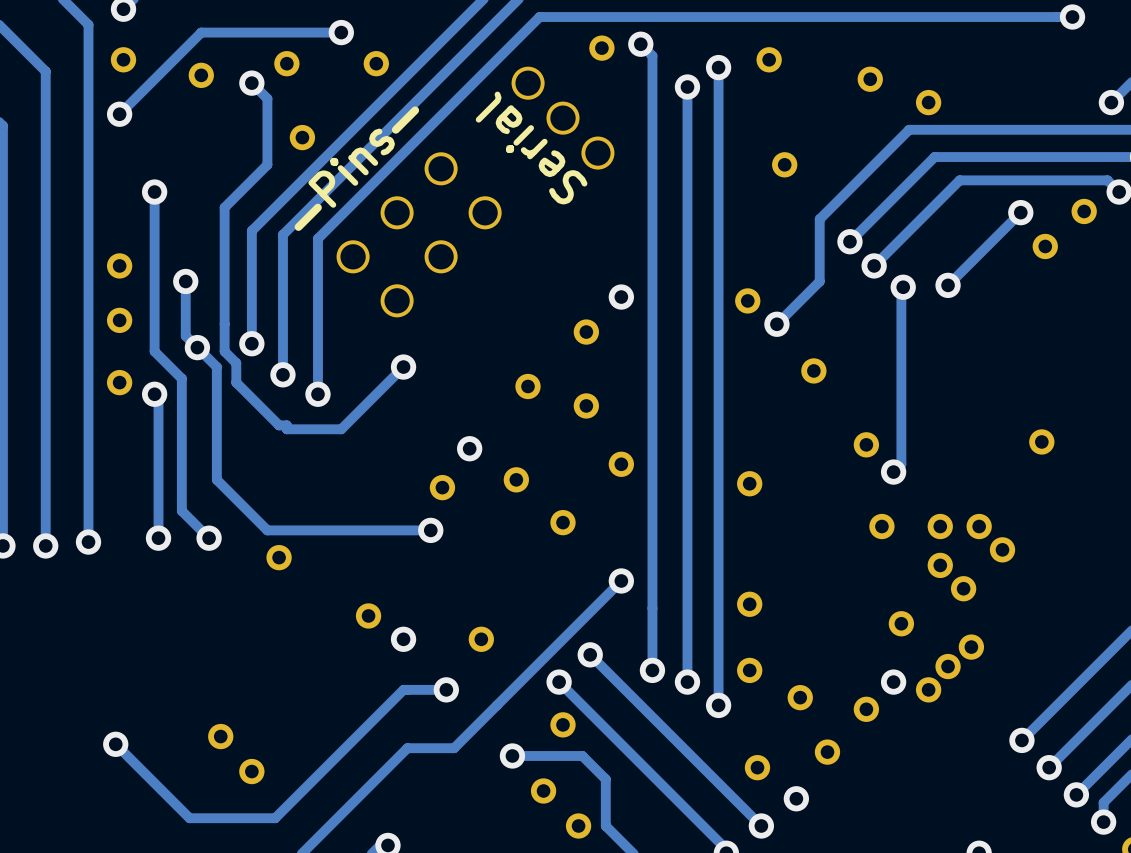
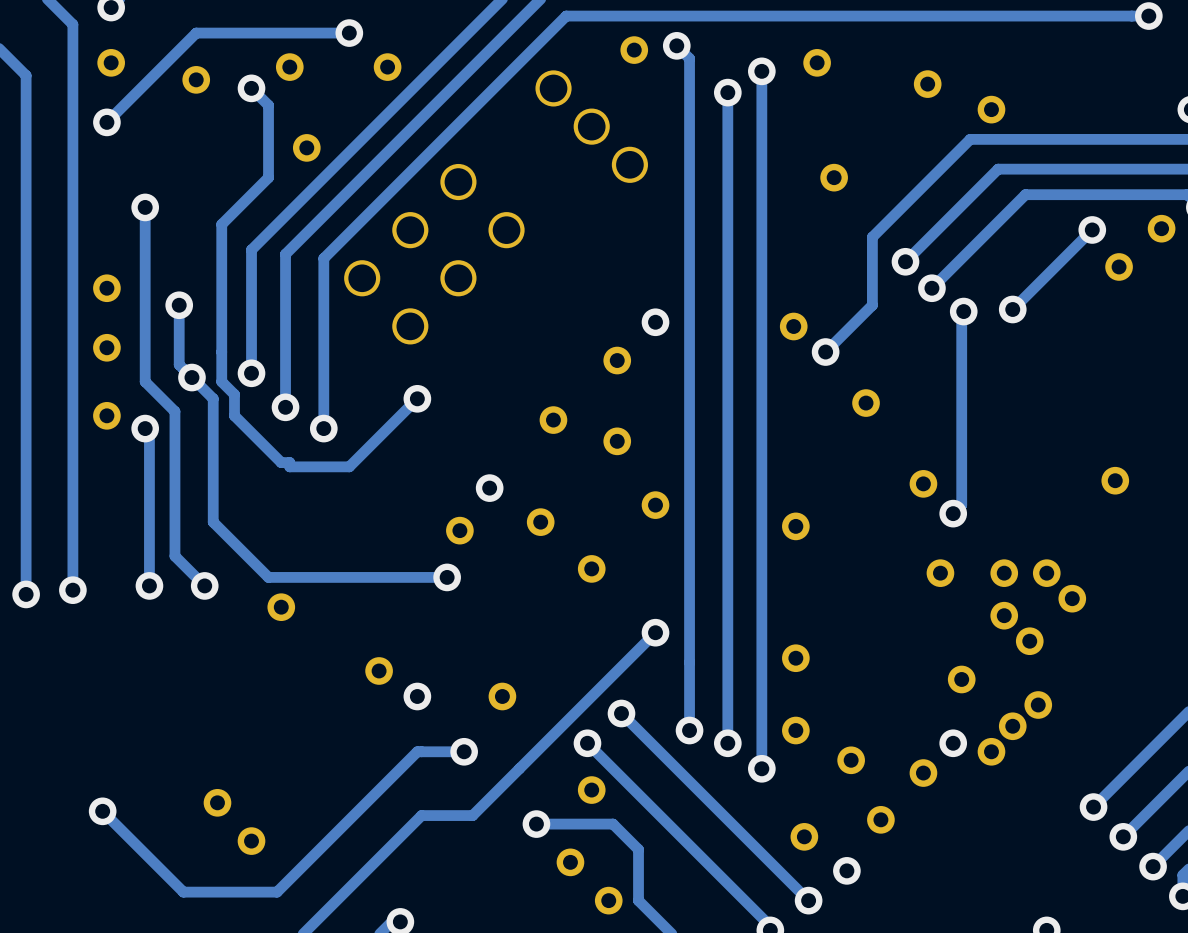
line: (415, 110) (395, 129) -> none
text: Serial (531, 147) -> none
text: Pins (351, 168) -> none
line: (317, 207) (298, 227) -> none

